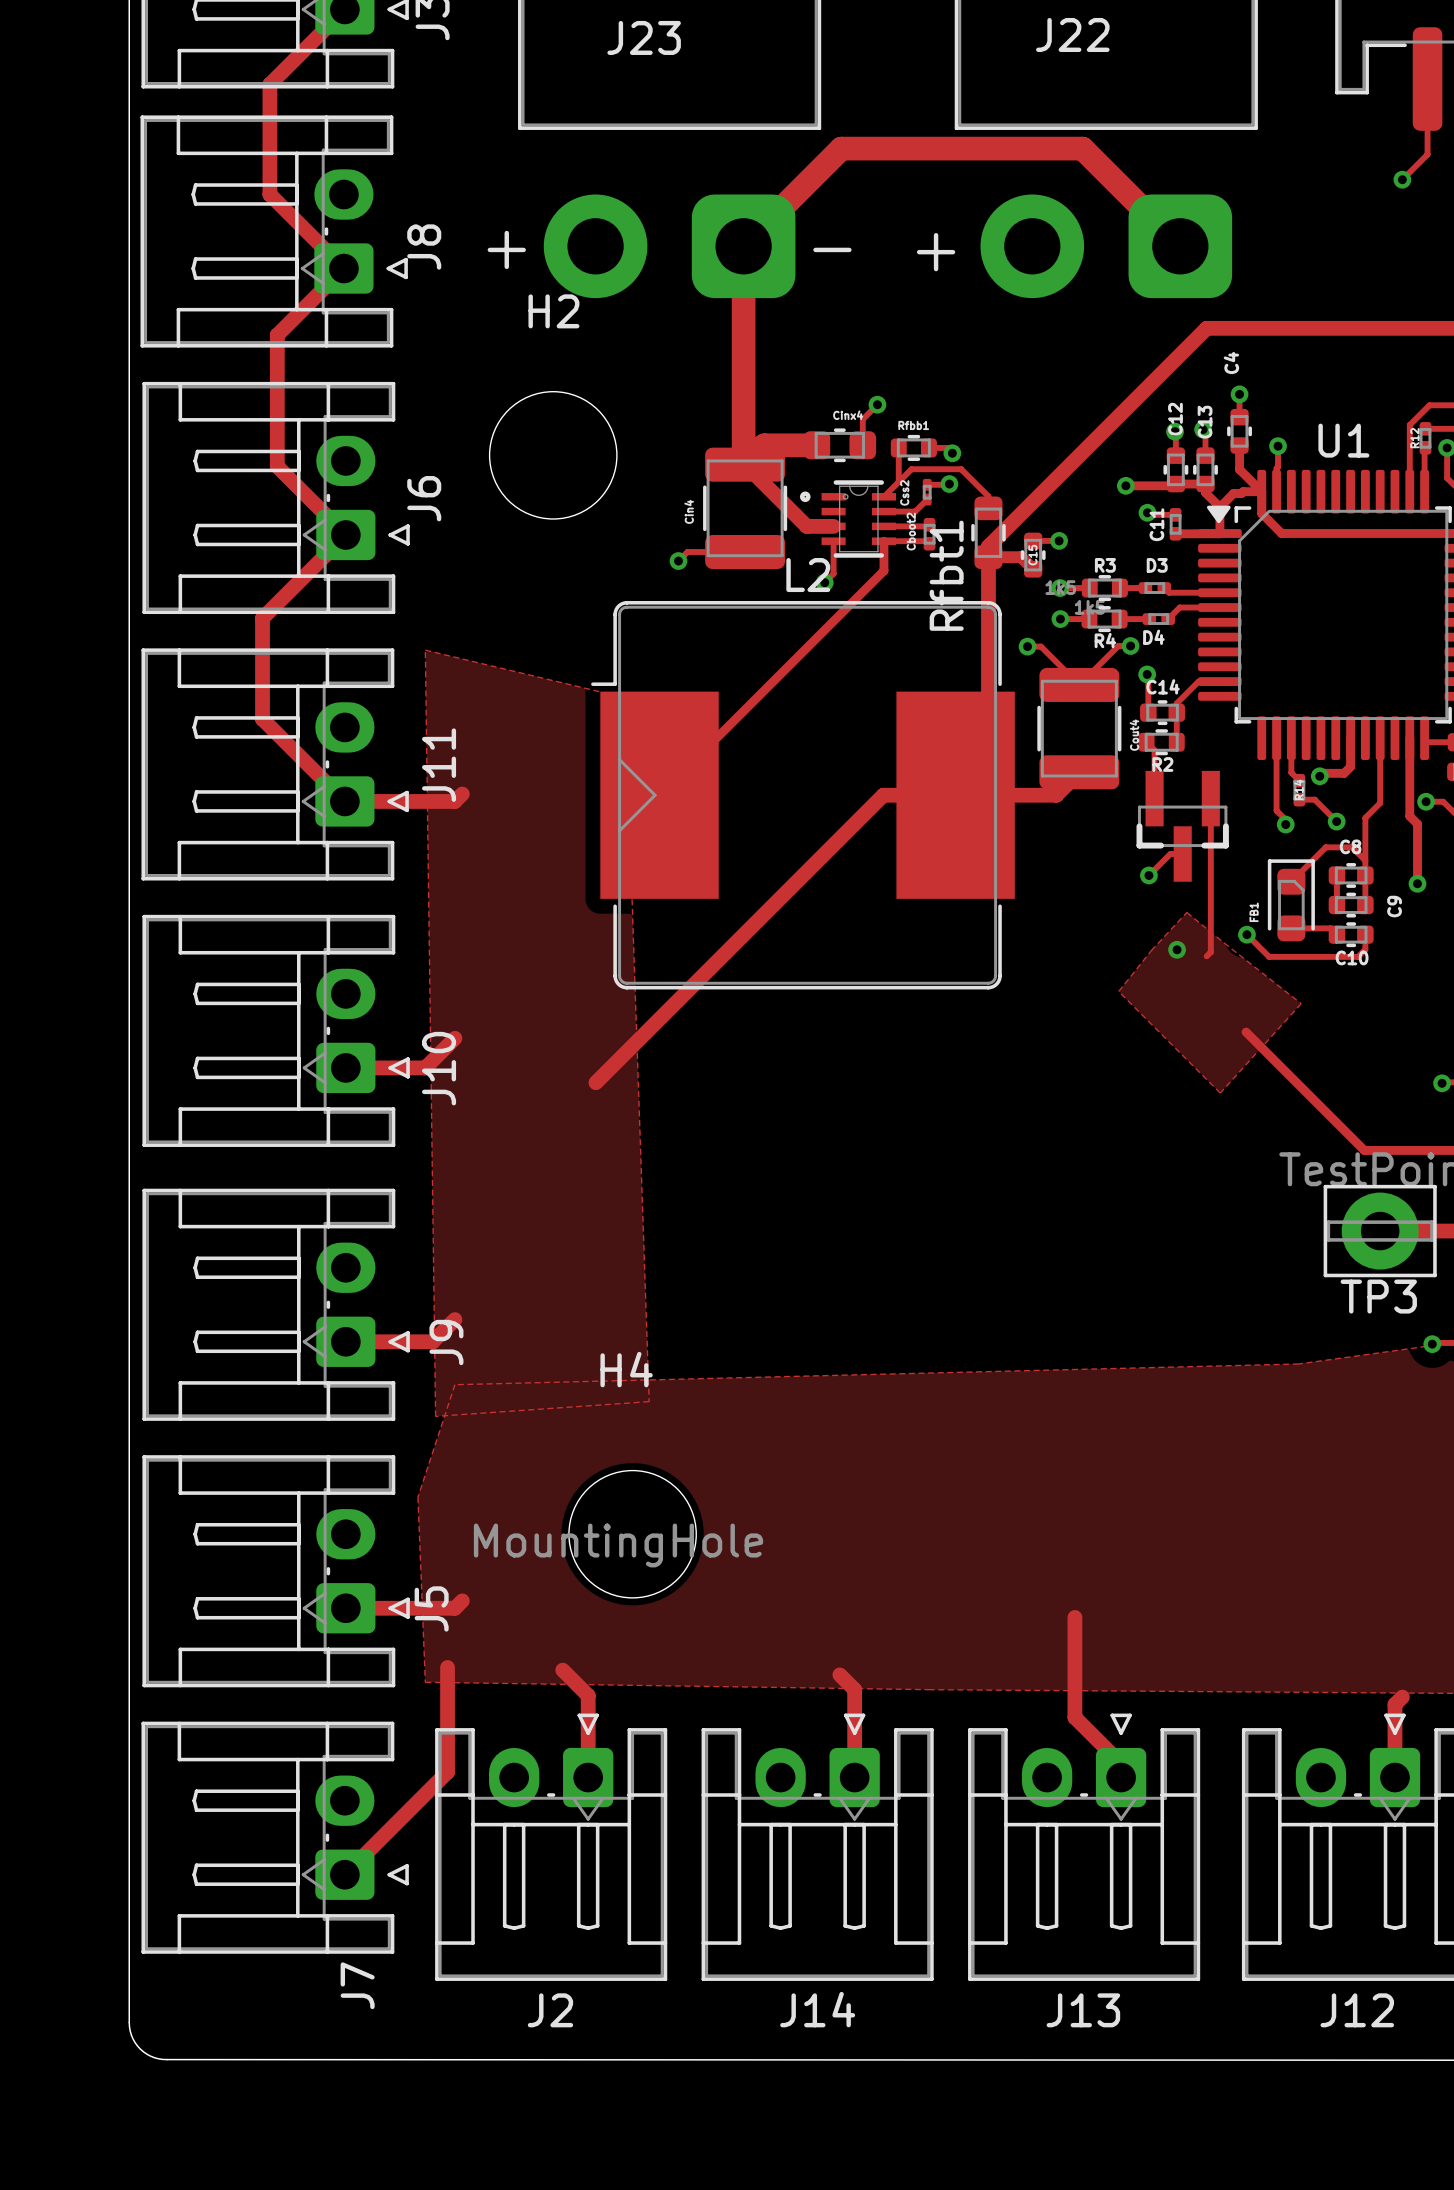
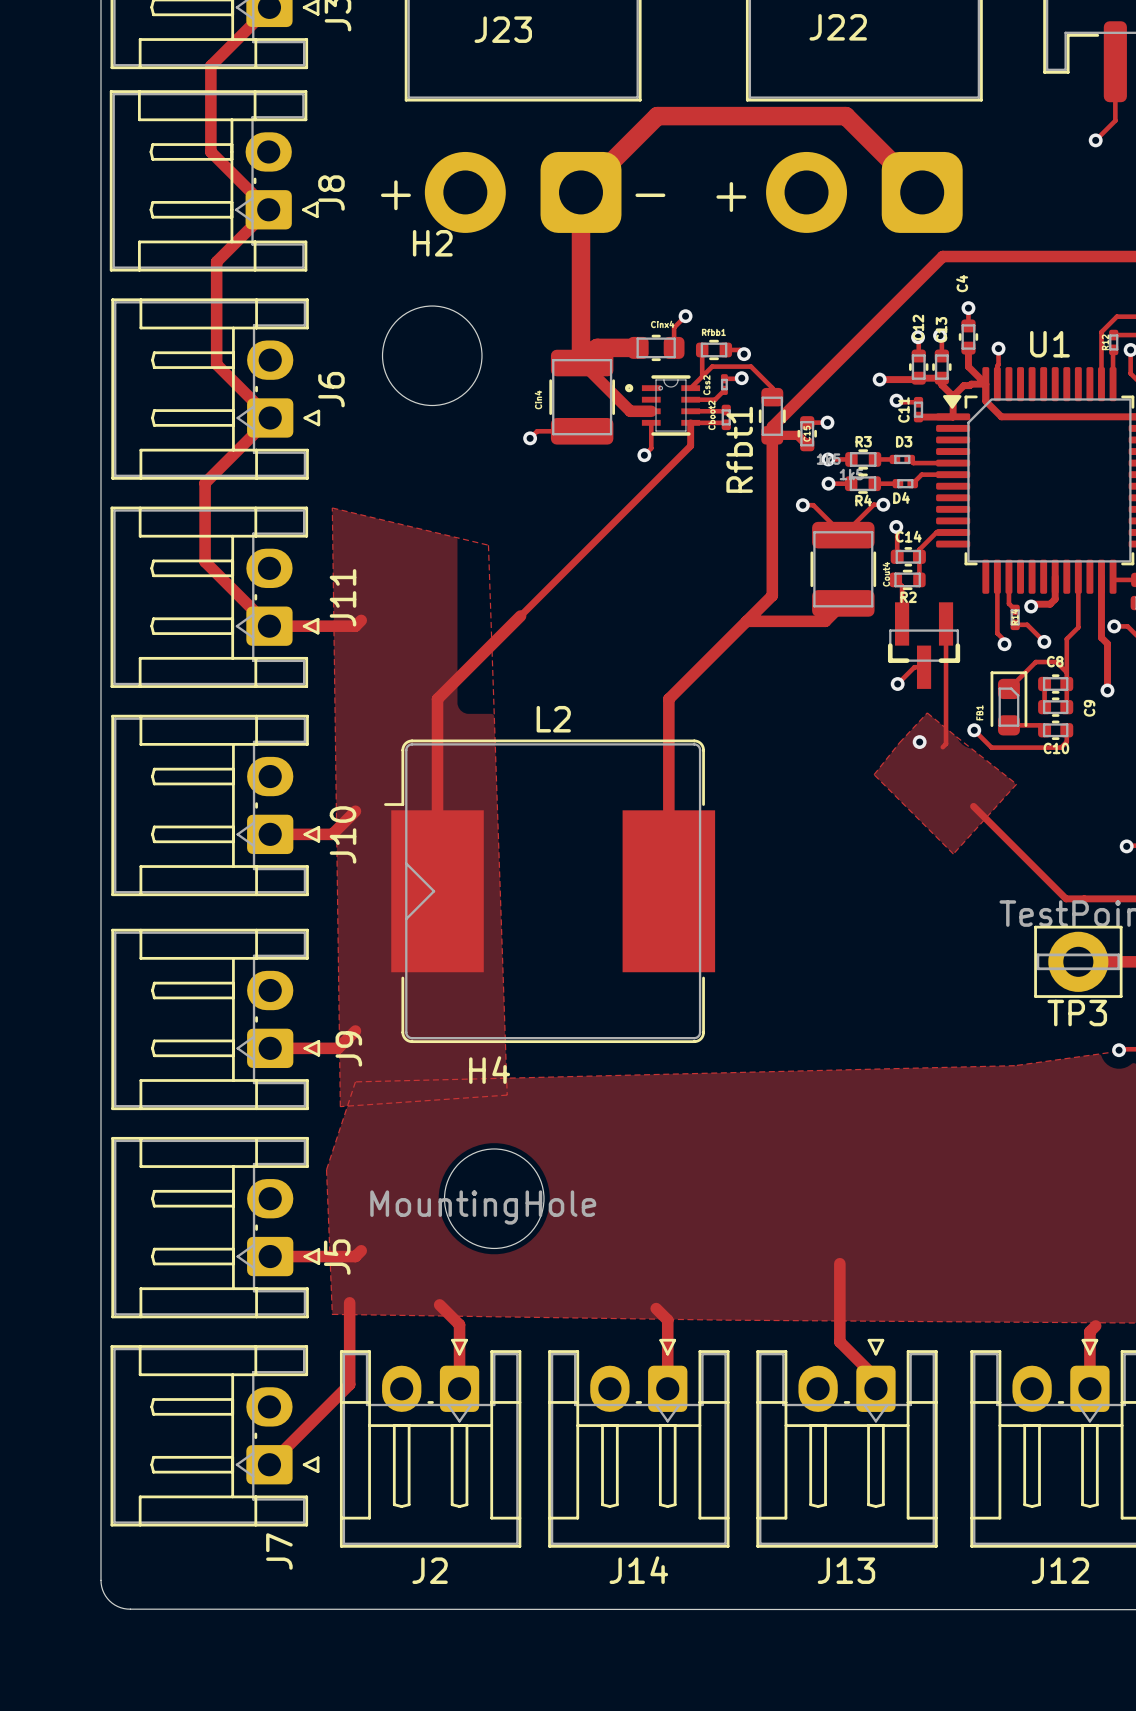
track: none -> (520, 616) (437, 699) (437, 891)
L2 position: (802, 795) -> (549, 891)
track: (955, 795) (883, 795) (595, 1082) -> (746, 621) (668, 699) (668, 891)

